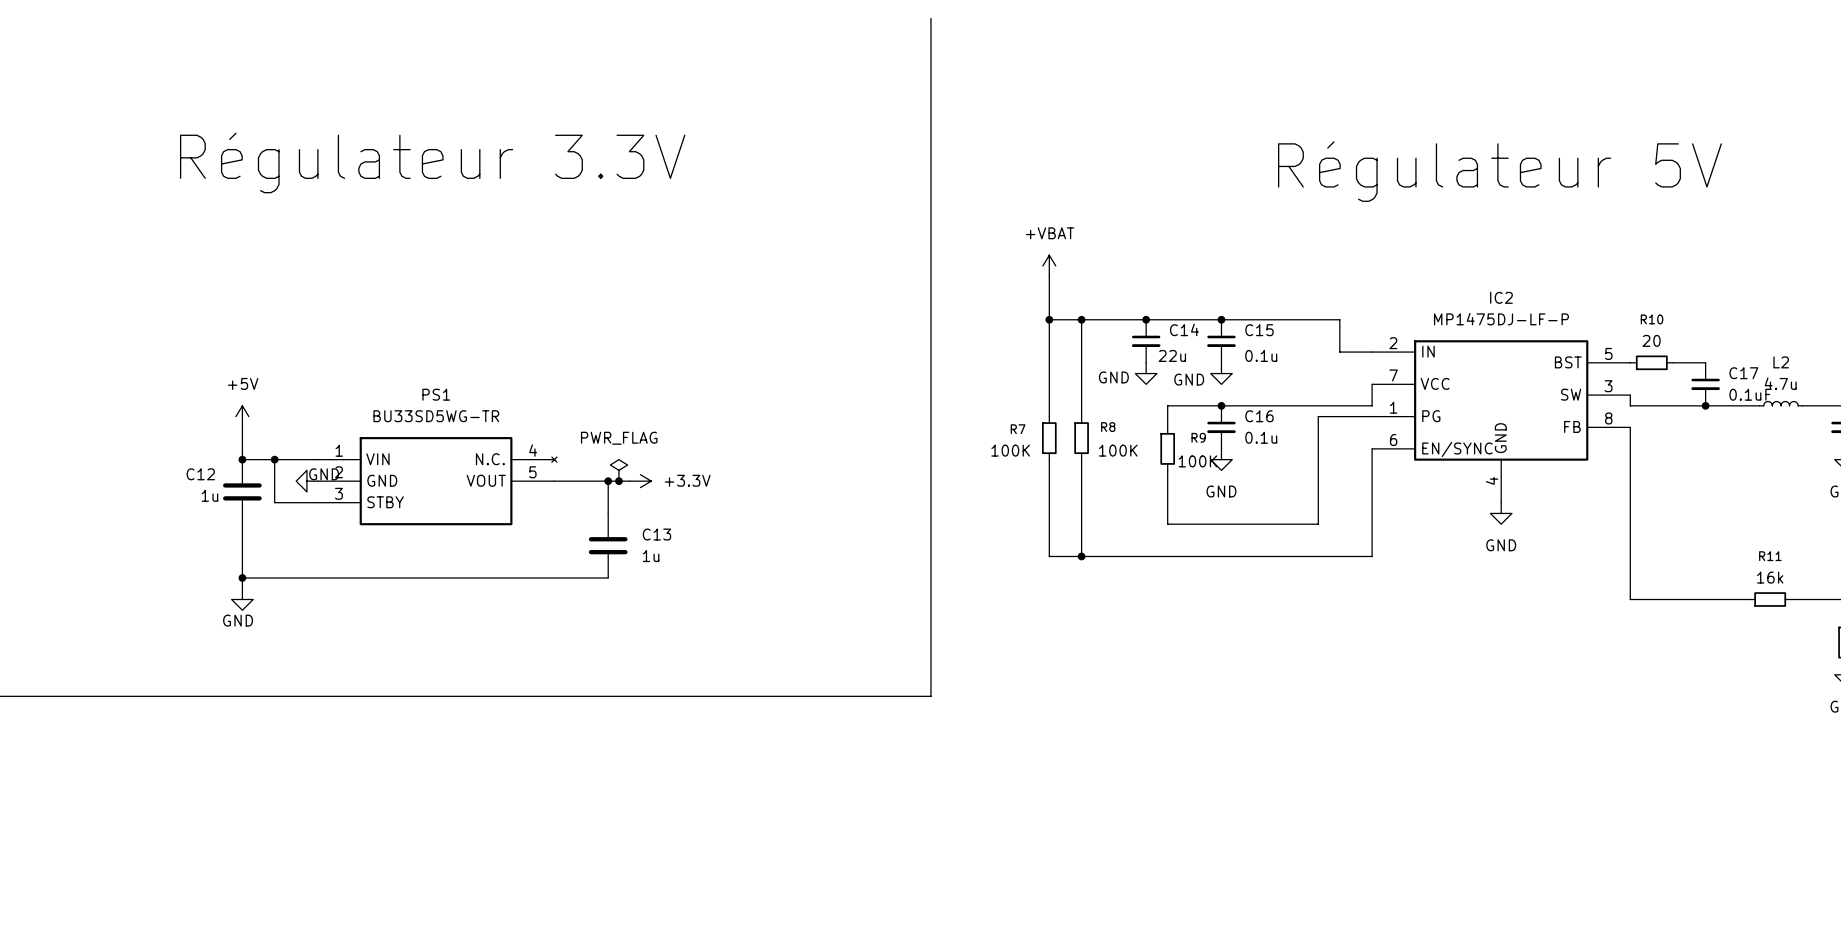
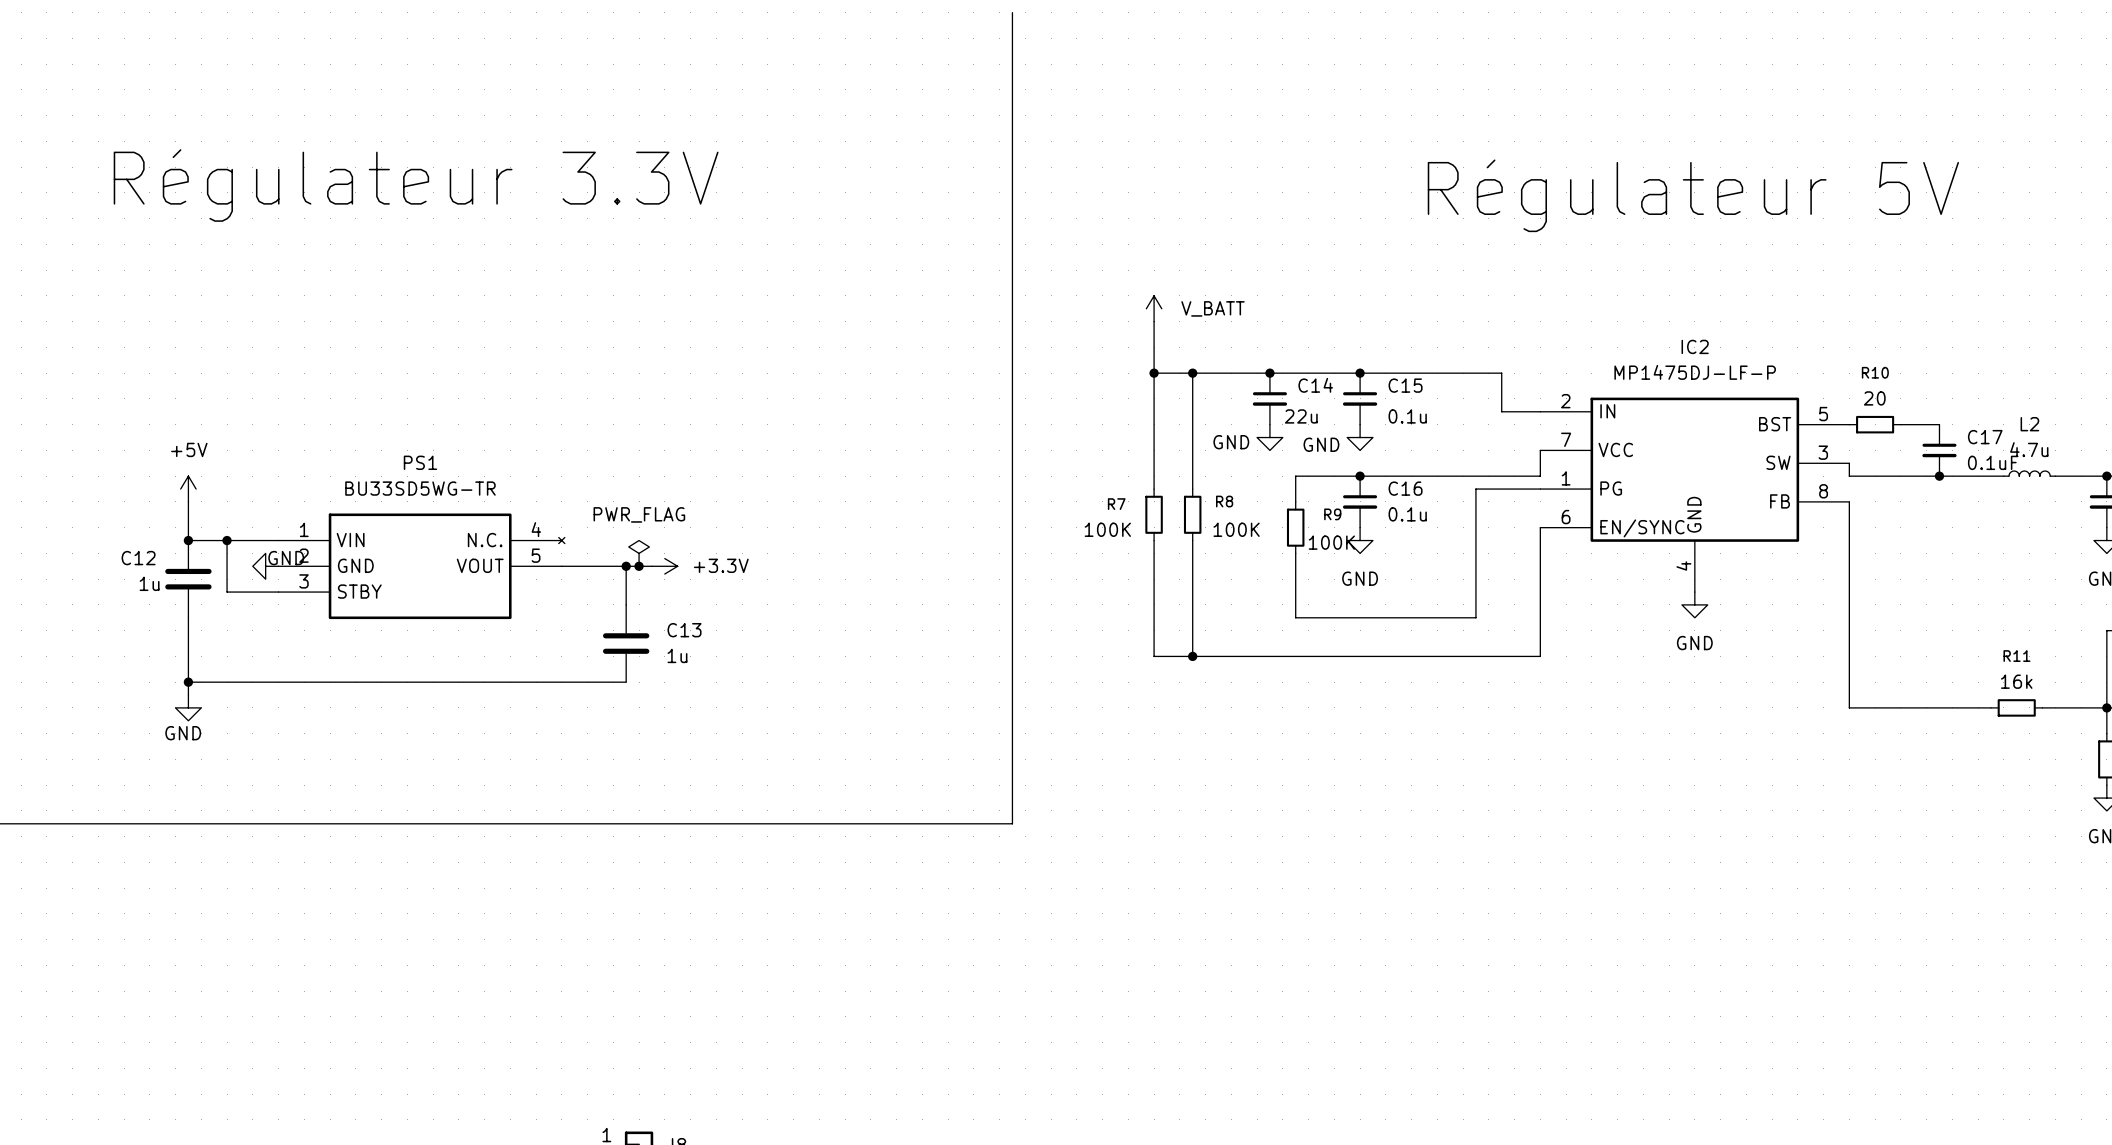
power symbol: +VBAT (1049, 265) -> V_BATT (1154, 308)

